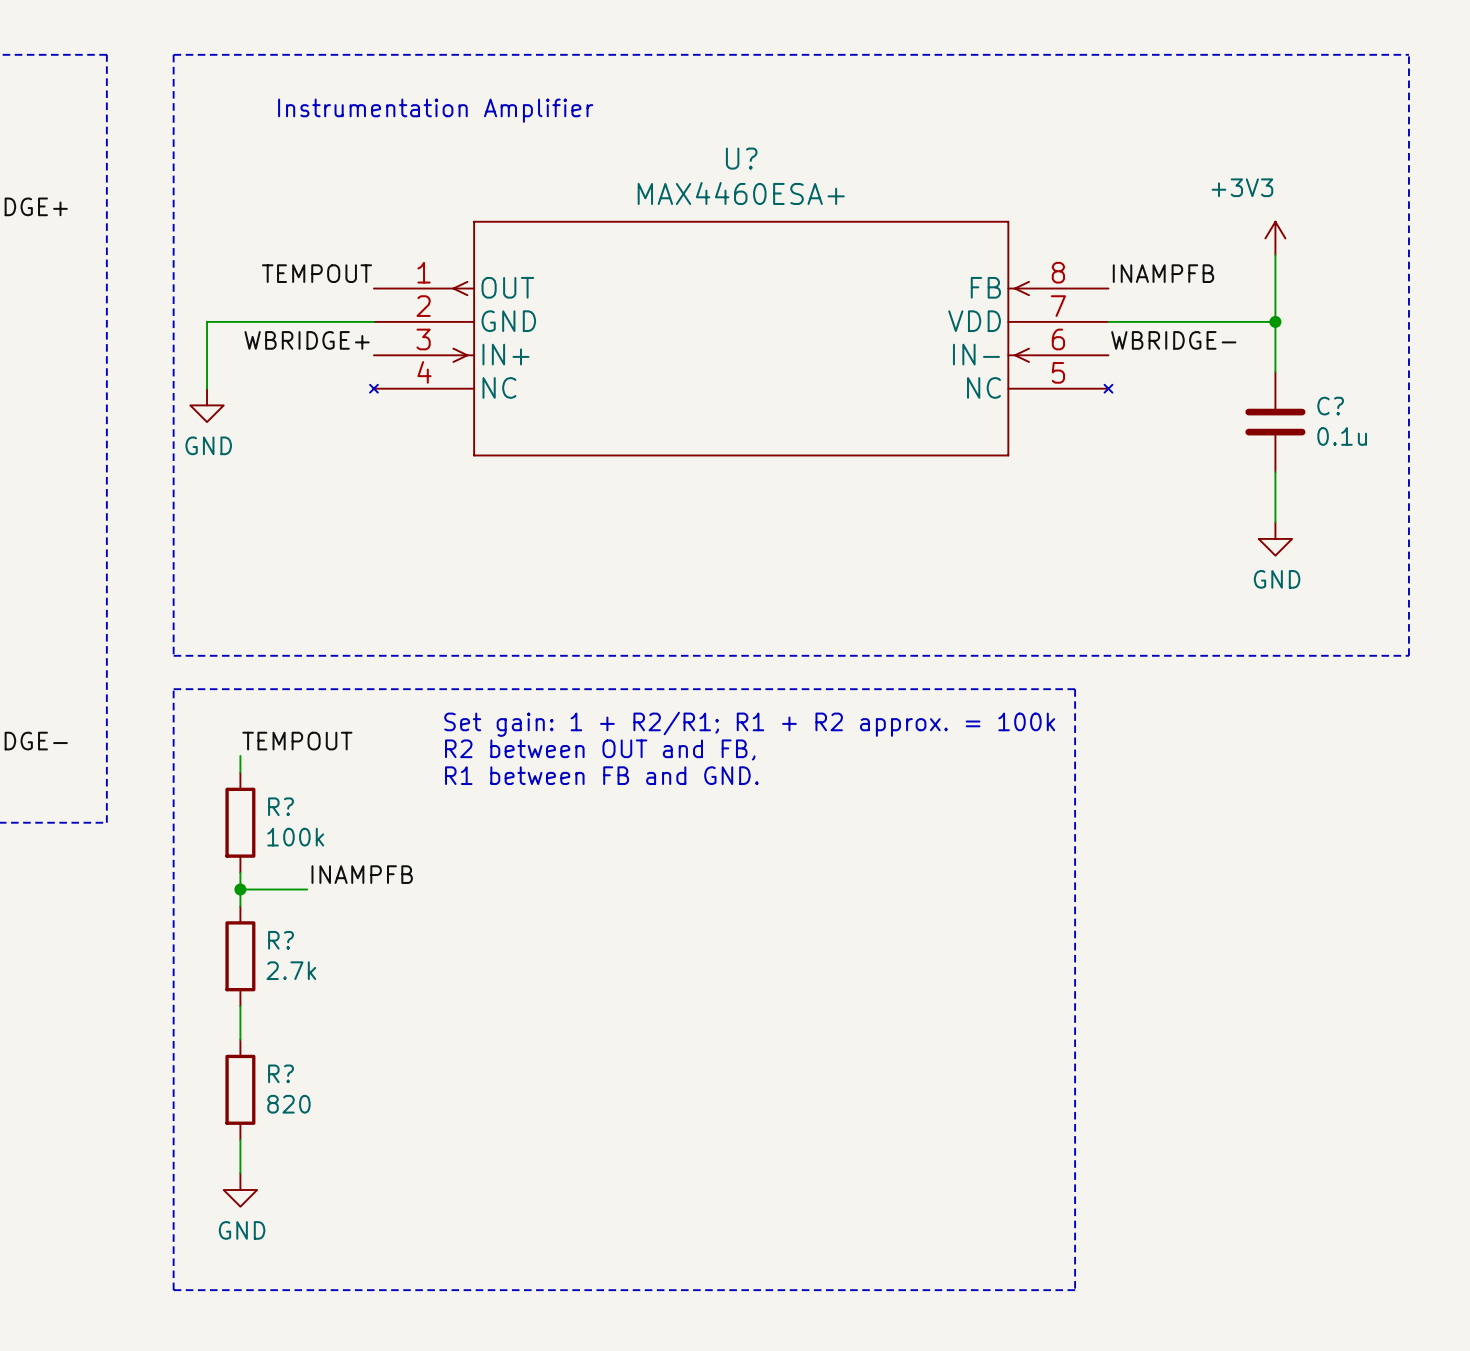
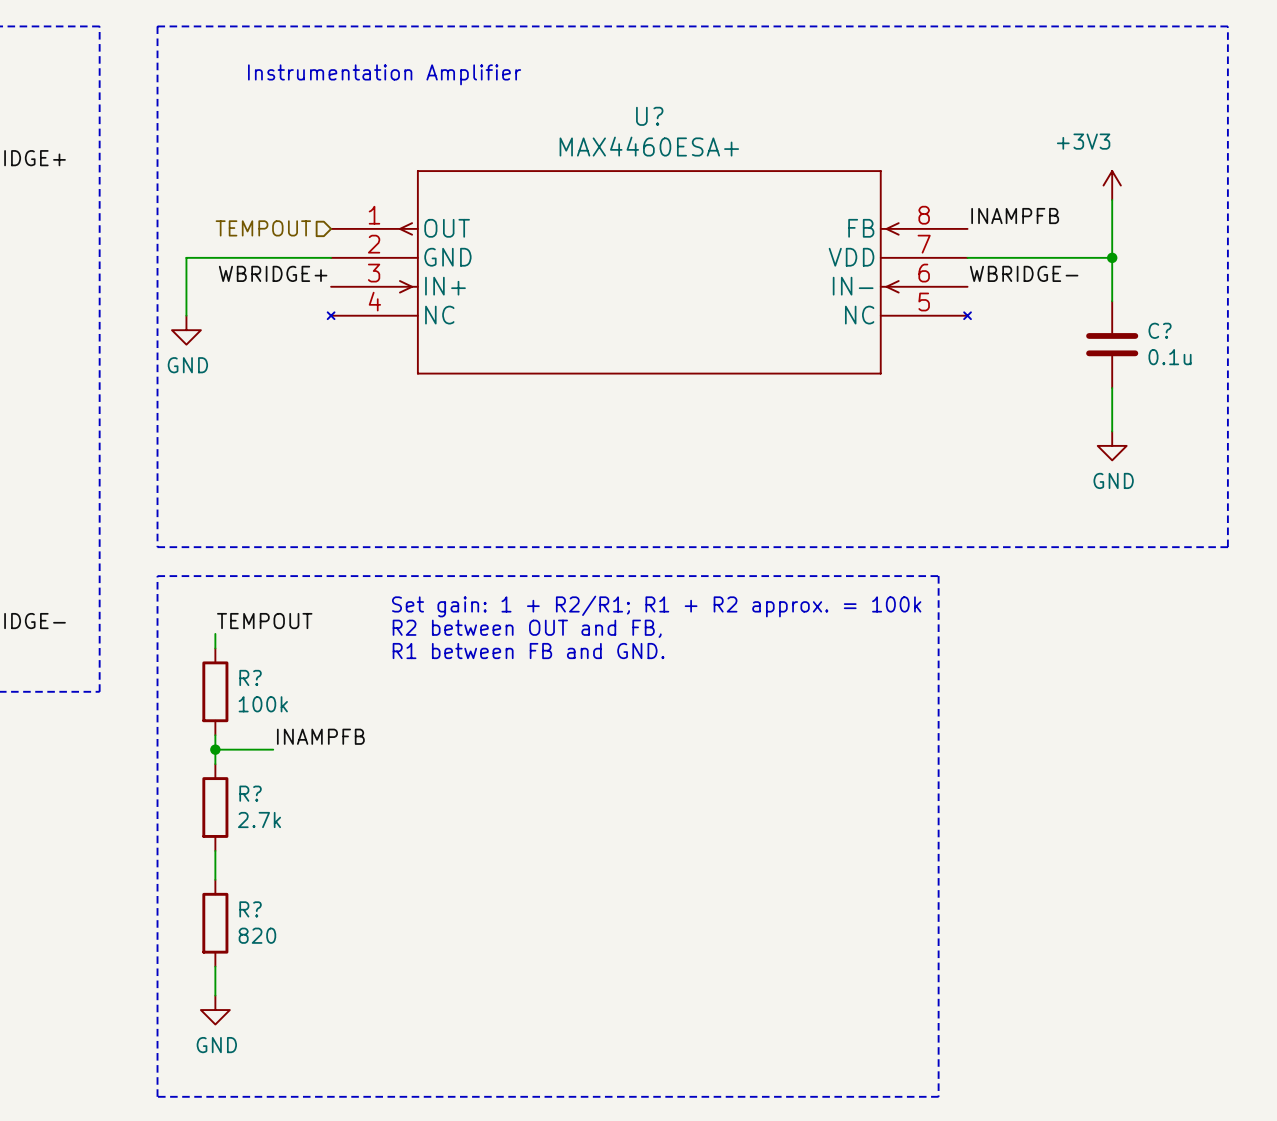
label: TEMPOUT (317, 273) -> none
hierarchical label: none -> TEMPOUT (263, 228)

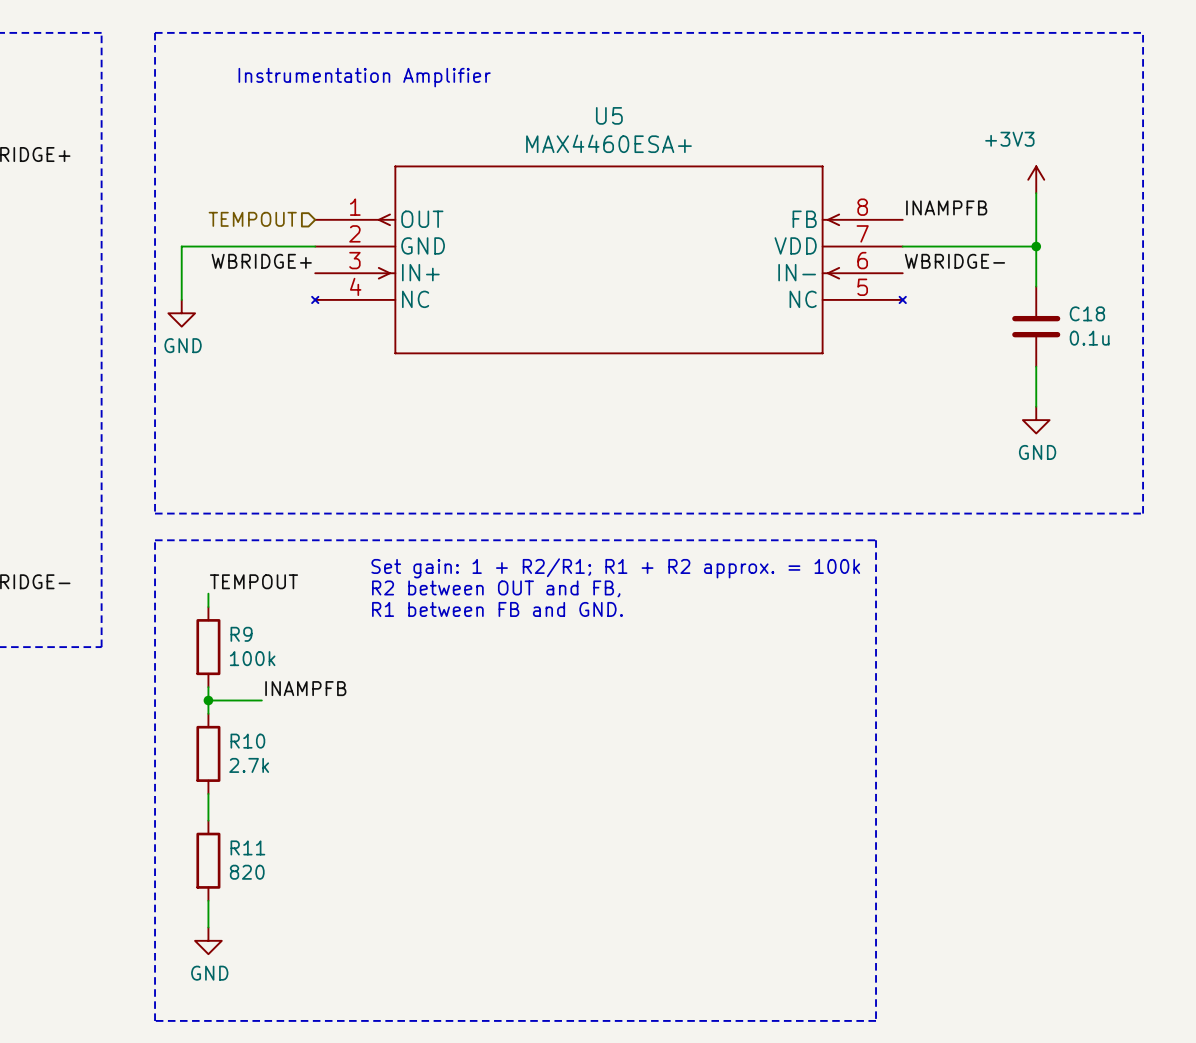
U? name: U? (649, 116) -> U5 (609, 115)
C? name: C? (1160, 330) -> C18 (1087, 313)
R? name: R? (250, 677) -> R9 (241, 634)
R? name: R? (250, 793) -> R10 (247, 741)
R? name: R? (250, 909) -> R11 (247, 847)

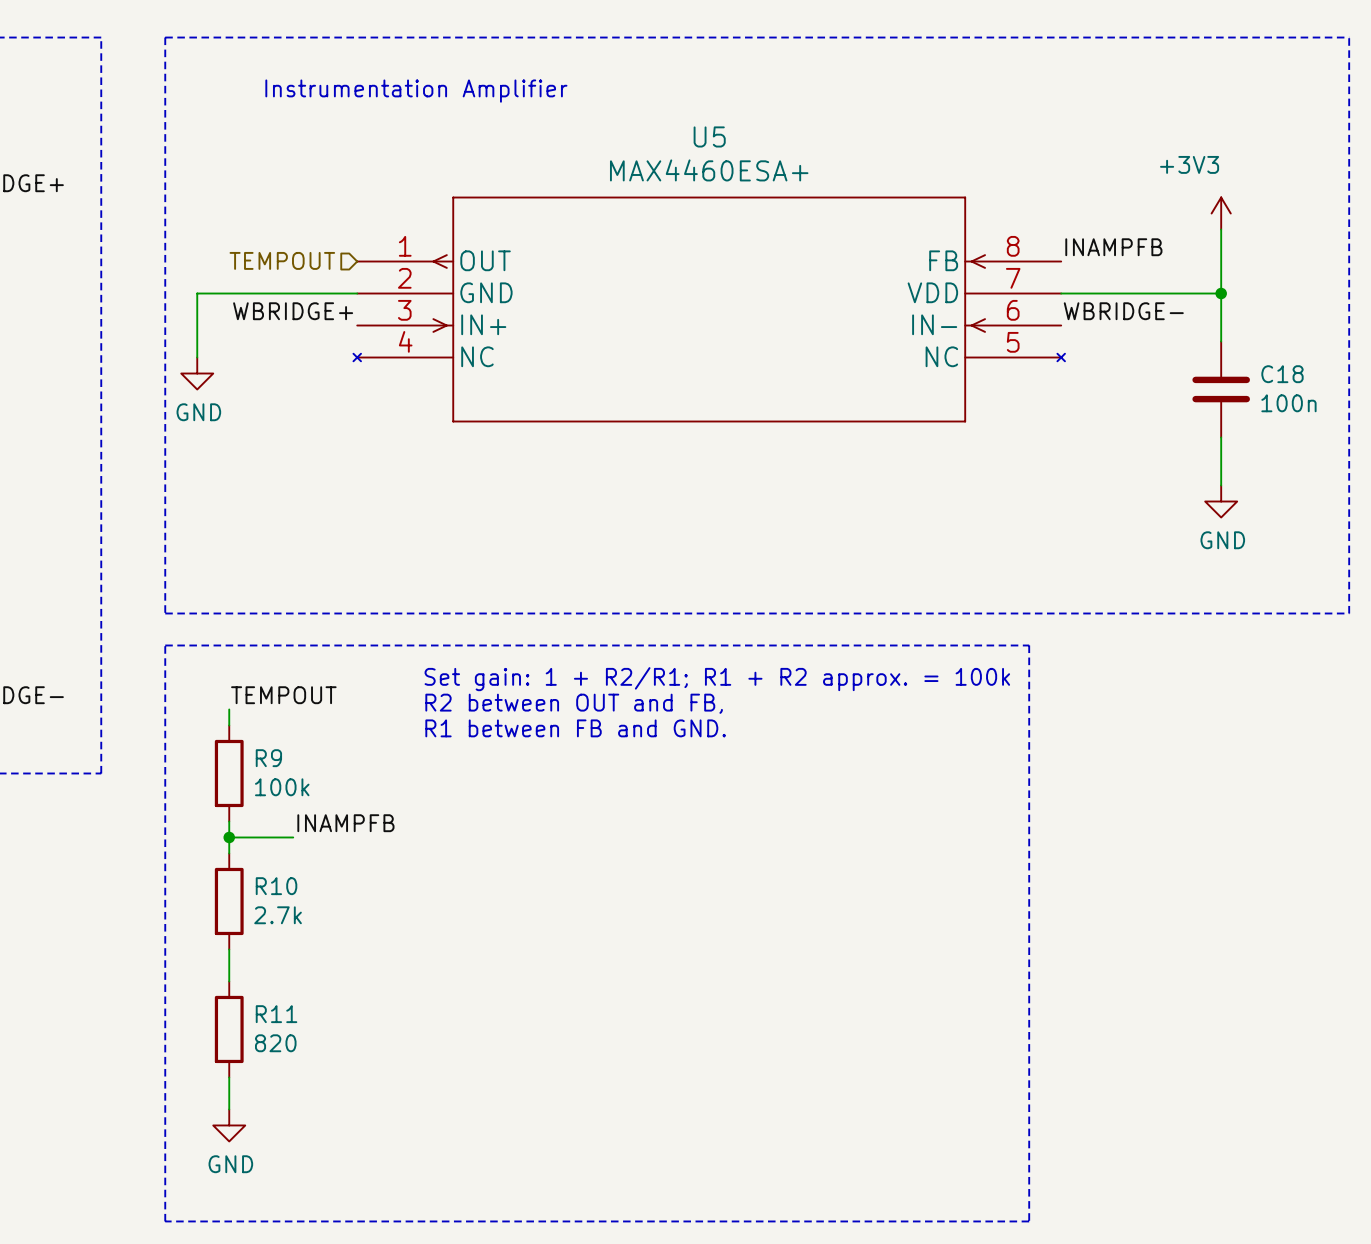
C18 value: 0.1u (1089, 338) -> 100n (1288, 403)

